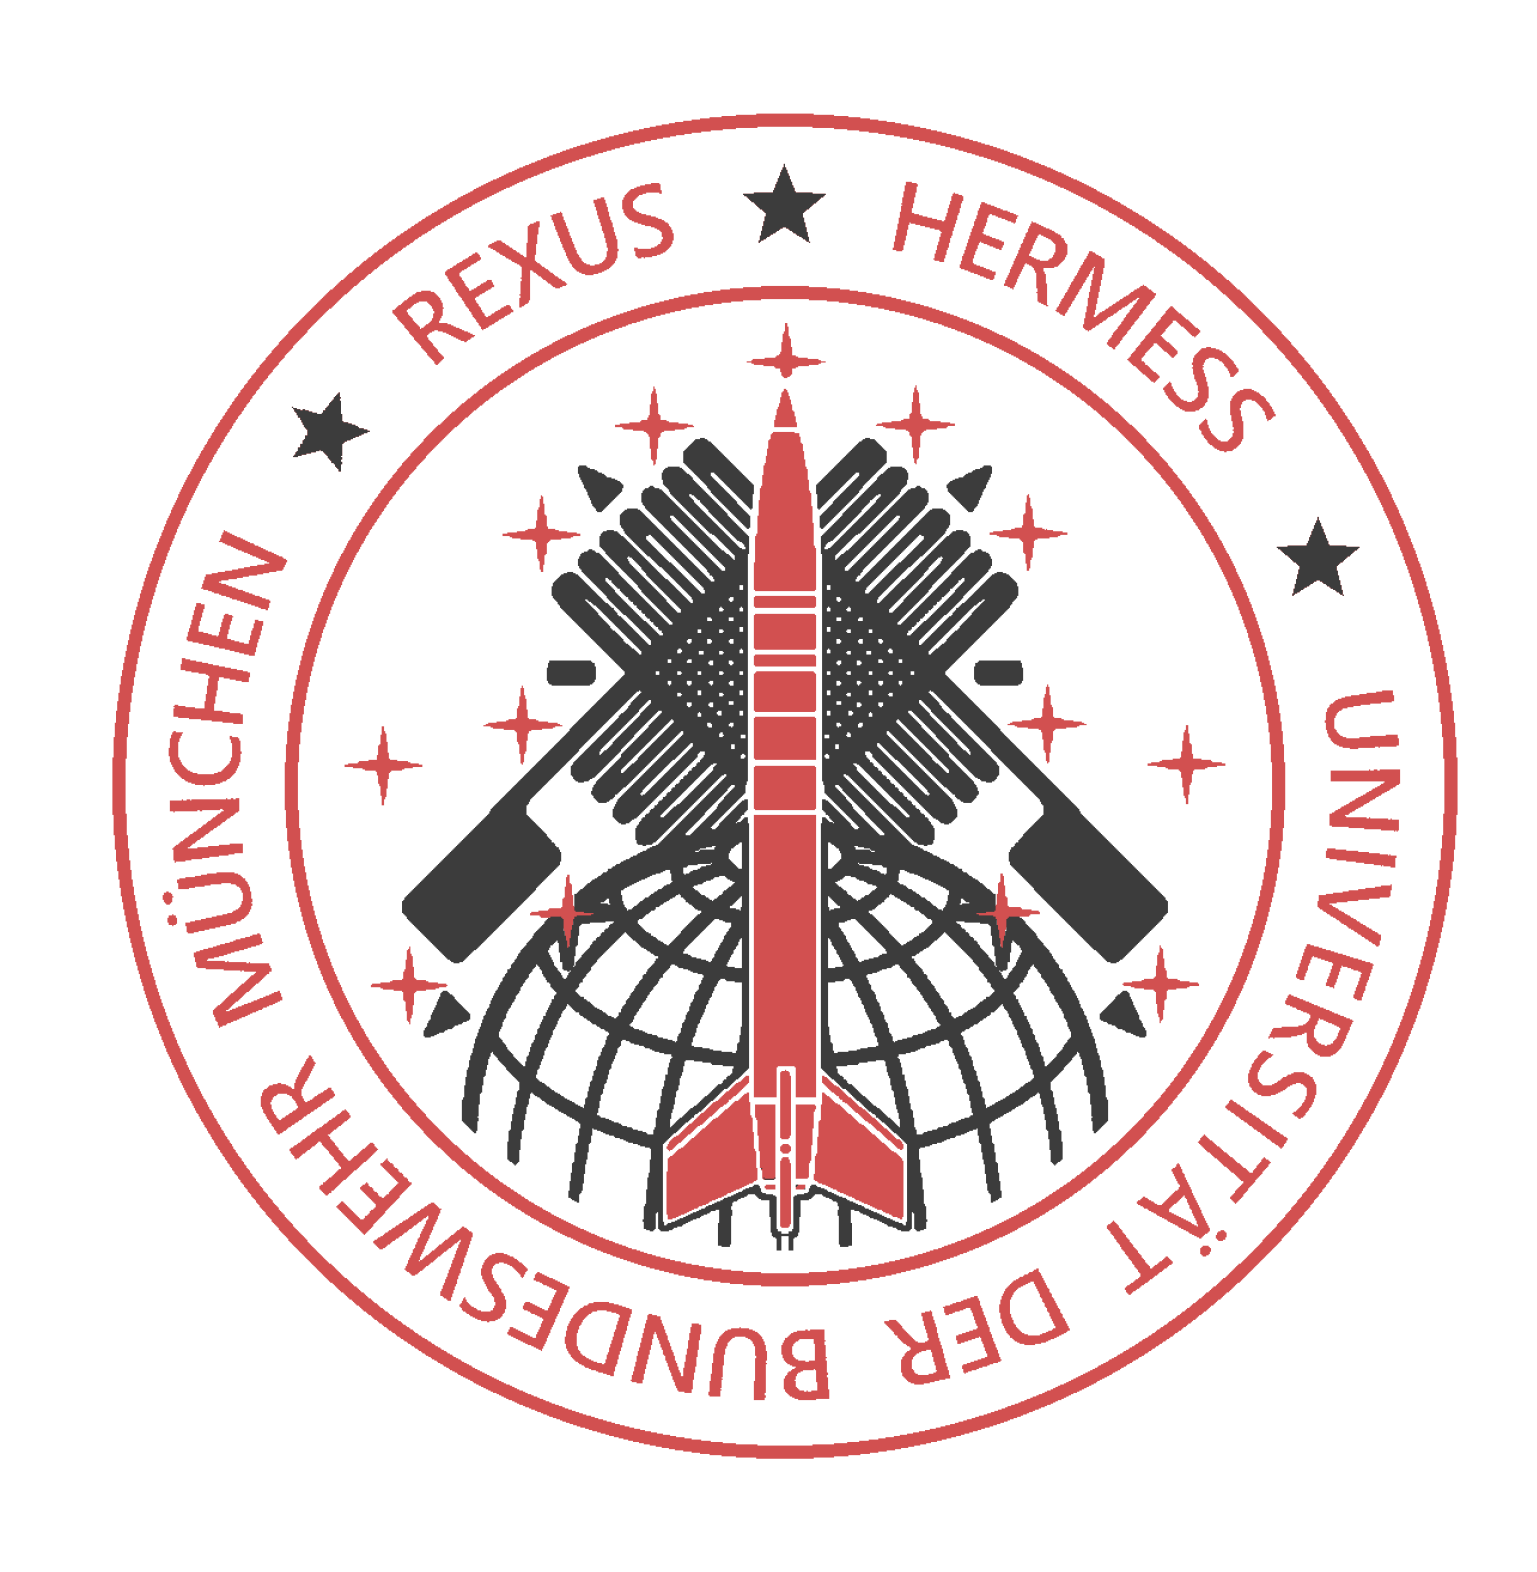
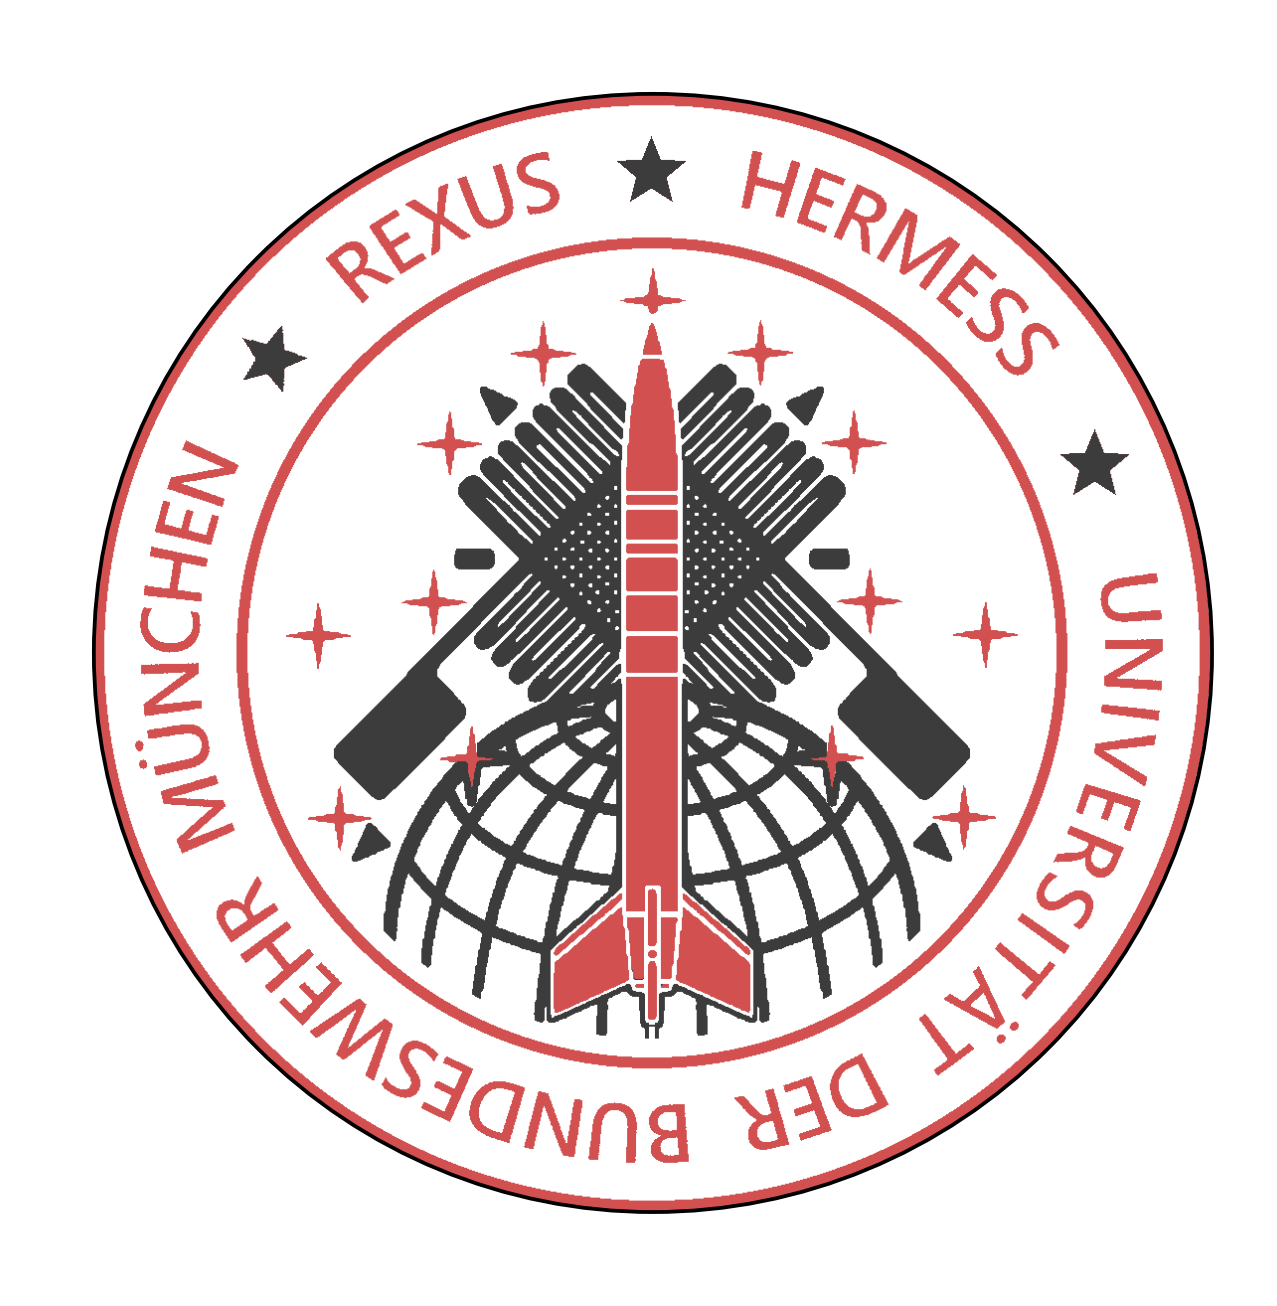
round board edge: none -> [91, 91, 1214, 1214]

